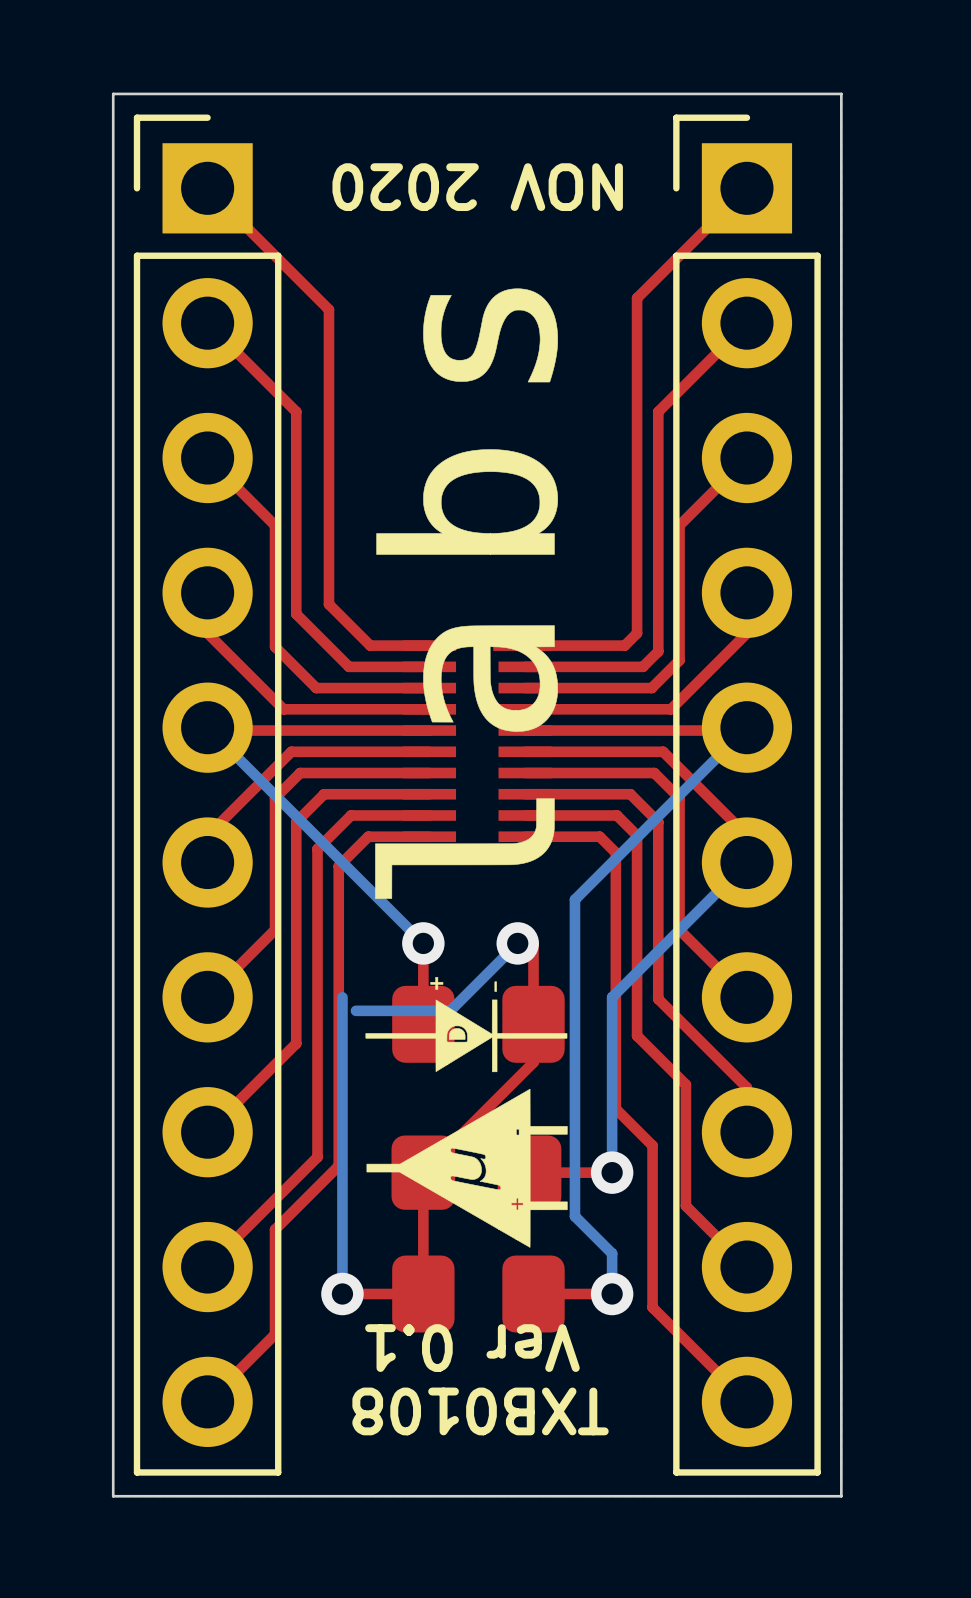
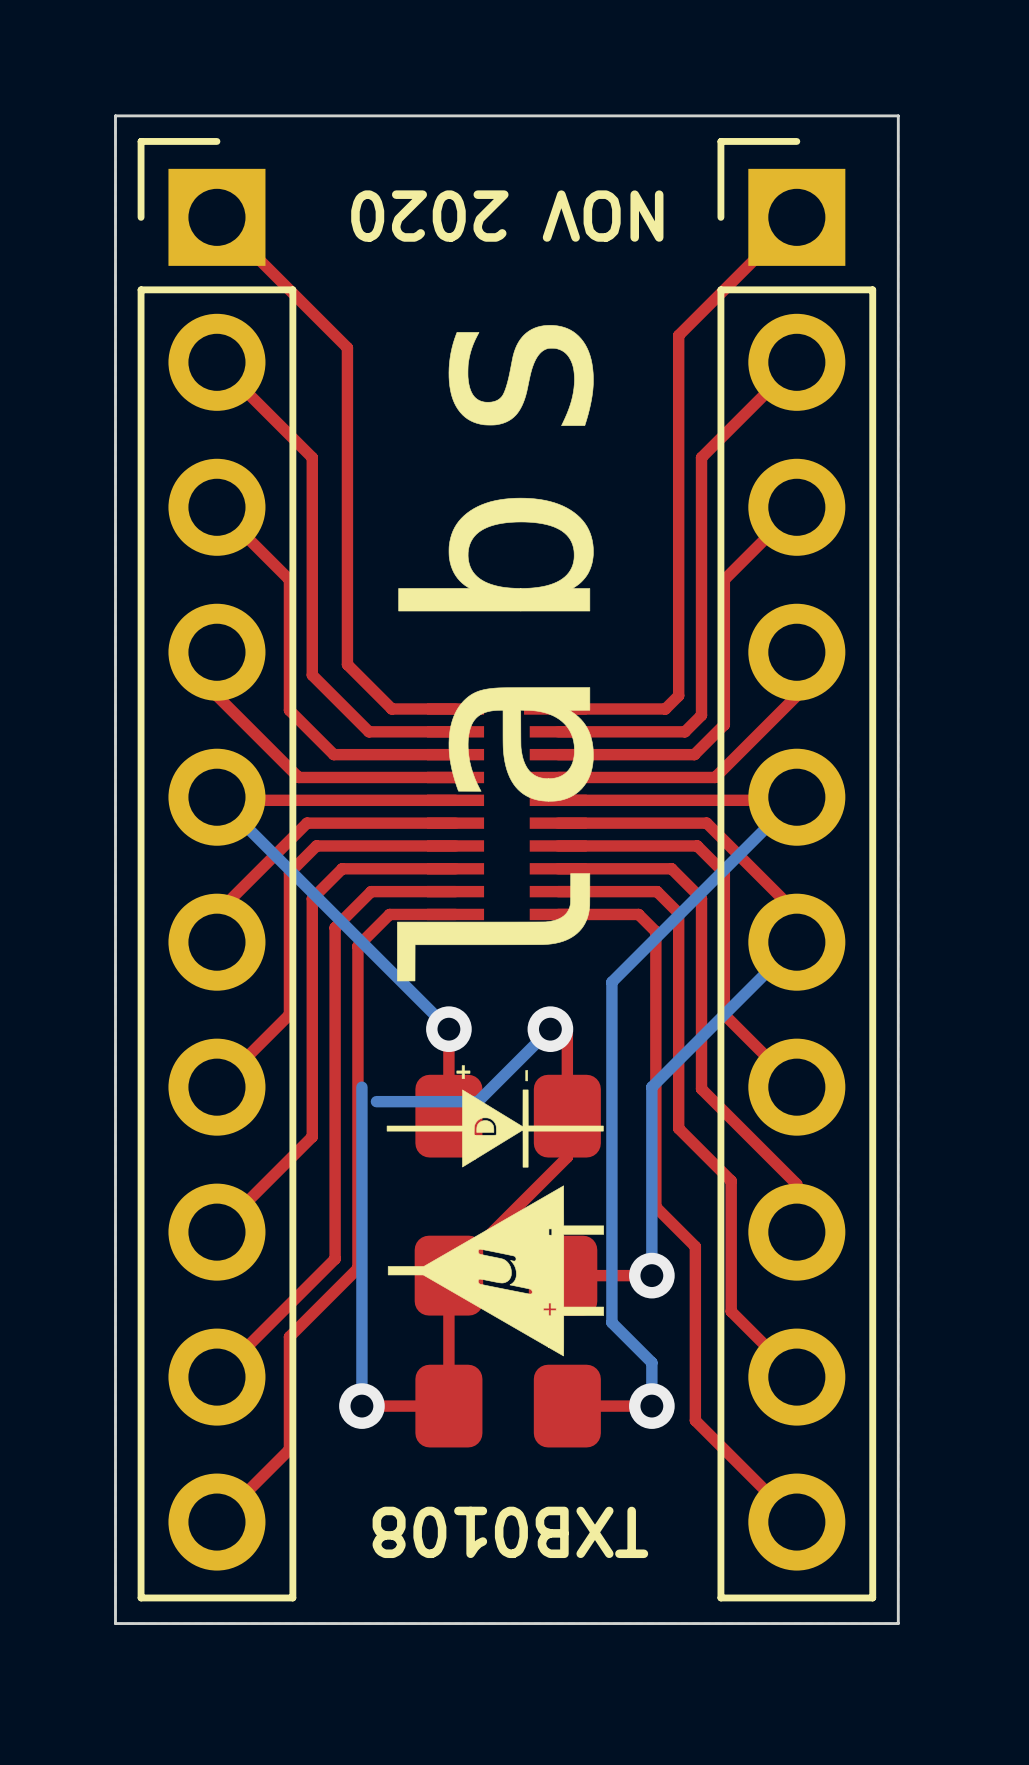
text: Ver 0.1 (472, 1348) -> none

